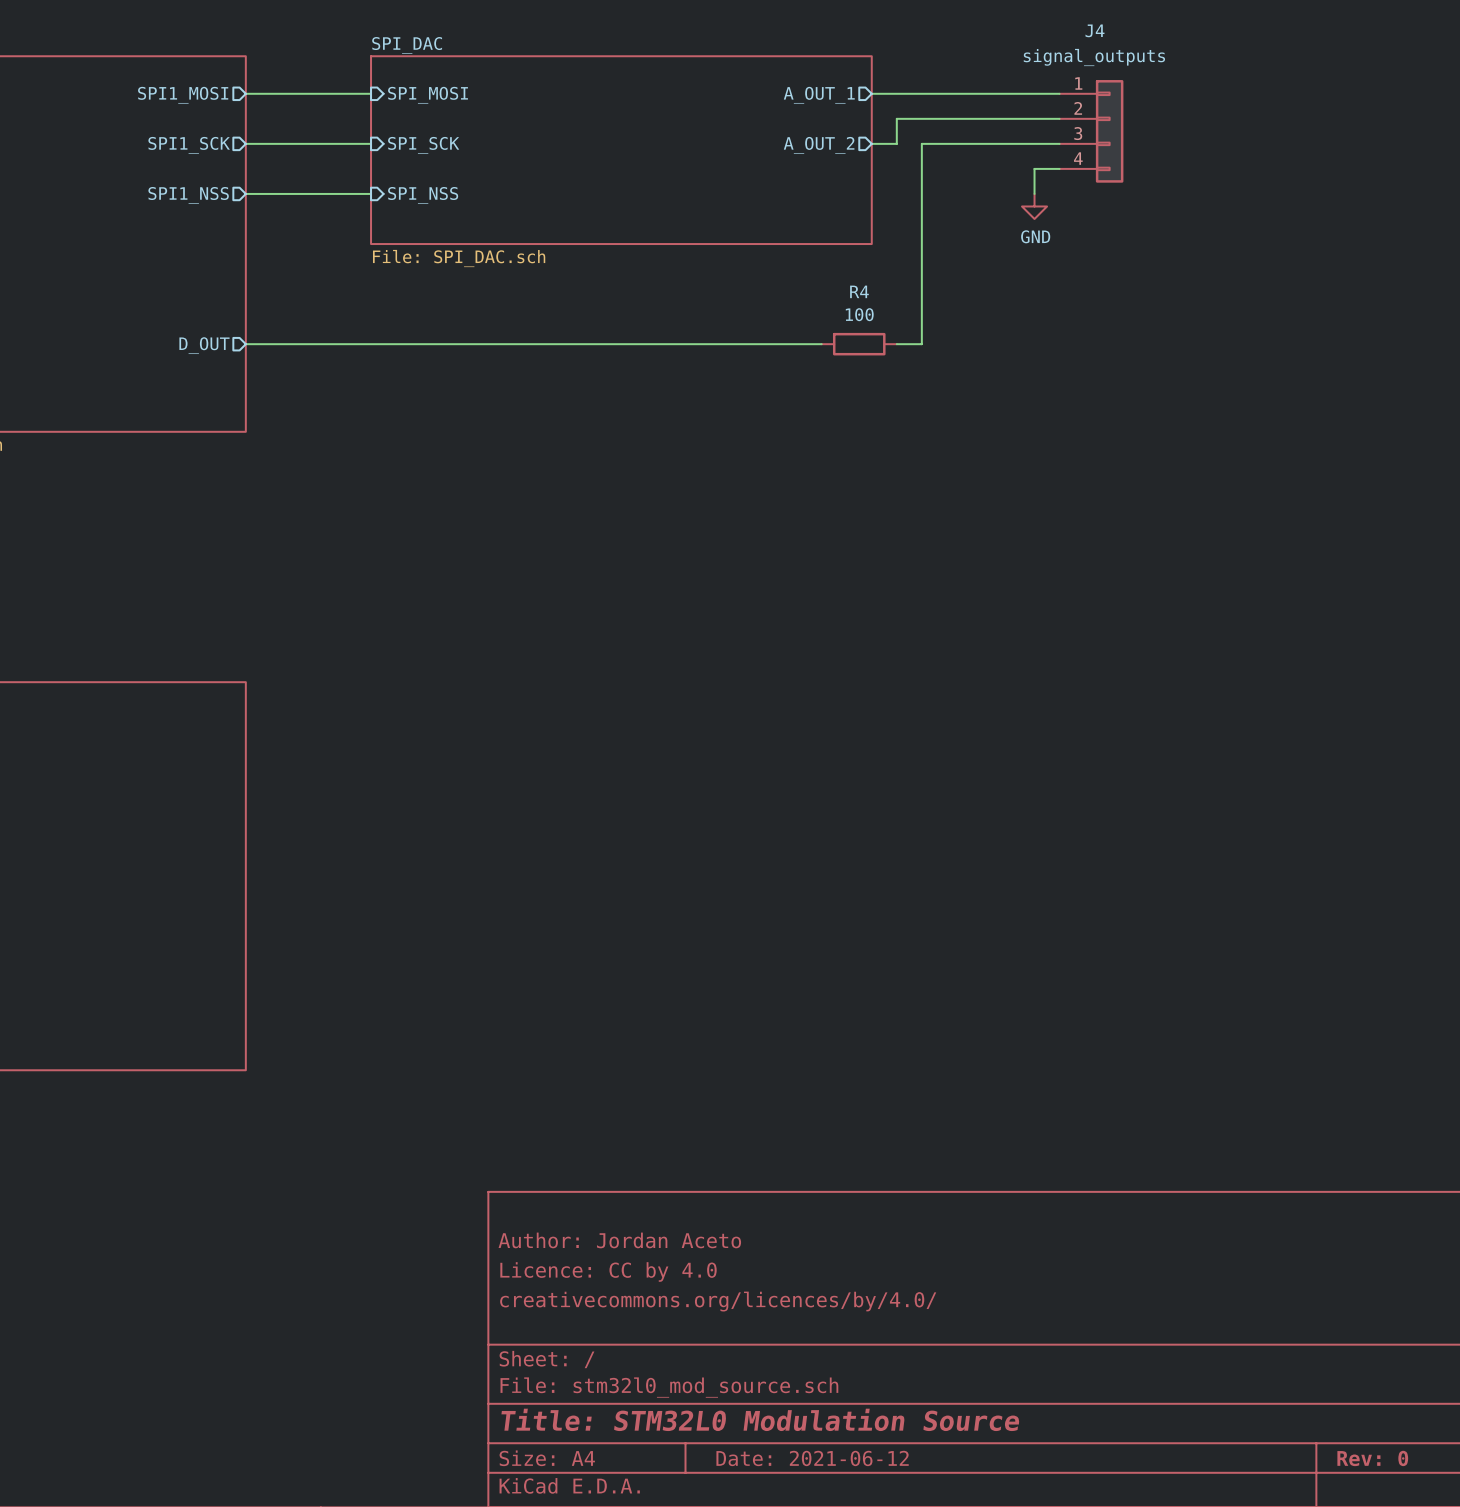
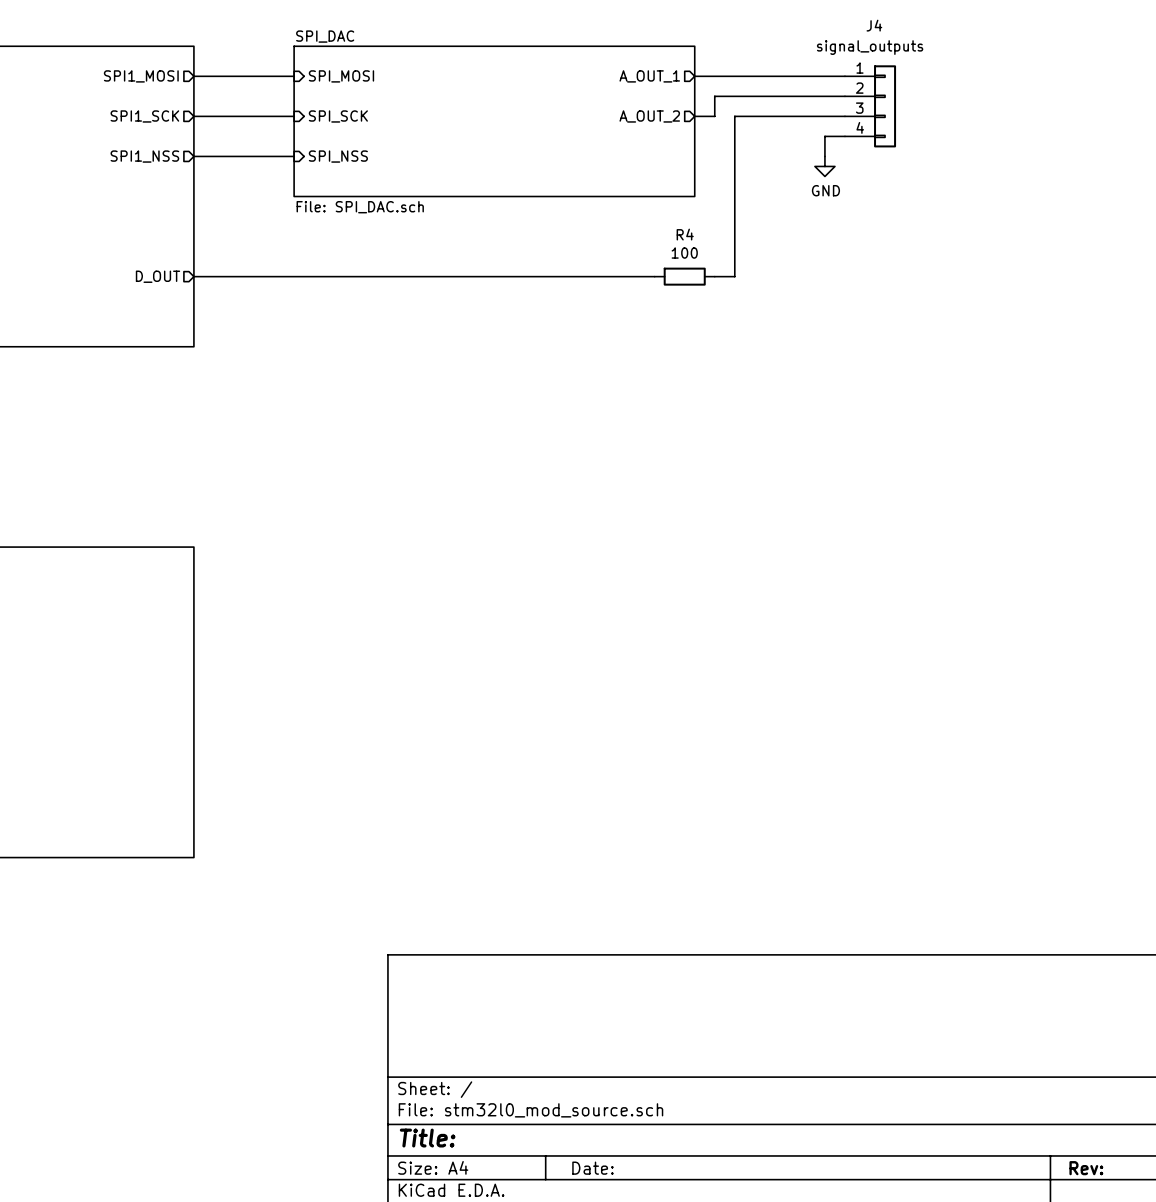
title block: Author: Jordan Aceto (619, 1240) -> none
title block: Licence: CC by 4.0 (608, 1271) -> none
title block: creativecommons.org/licences/by/4.0/ (718, 1301) -> none
title block: Title: STM32L0 Modulation Source (760, 1419) -> Title: (427, 1138)
title block: Date: 2021-06-12 (812, 1458) -> Date: (592, 1168)
title block: Rev: 0 (1372, 1458) -> Rev: (1086, 1168)

